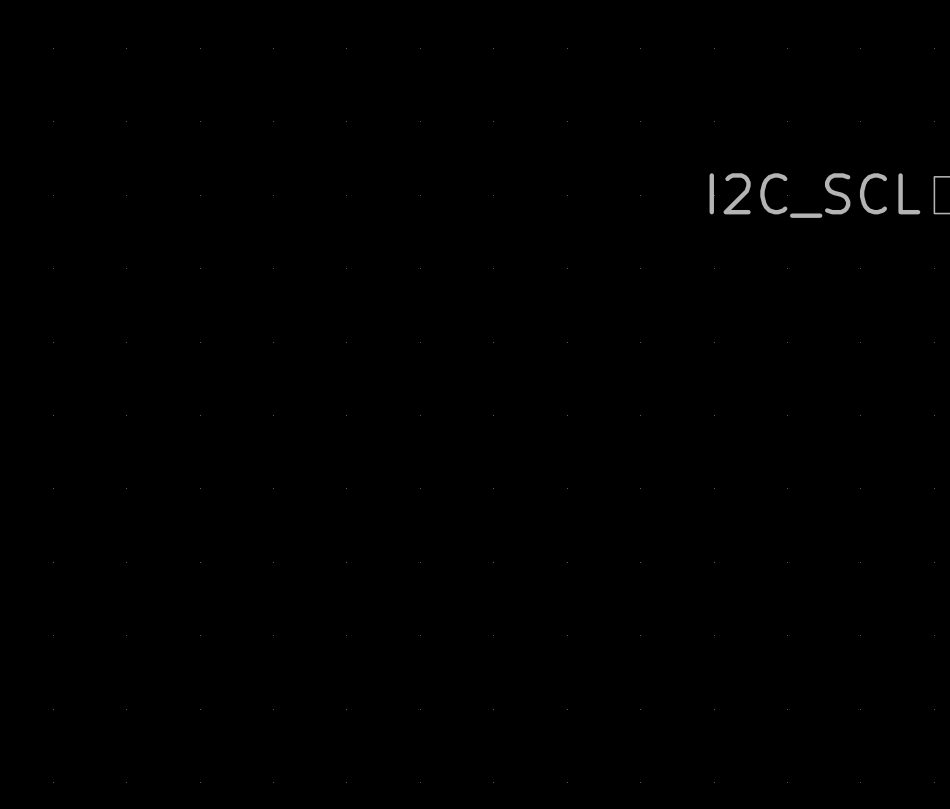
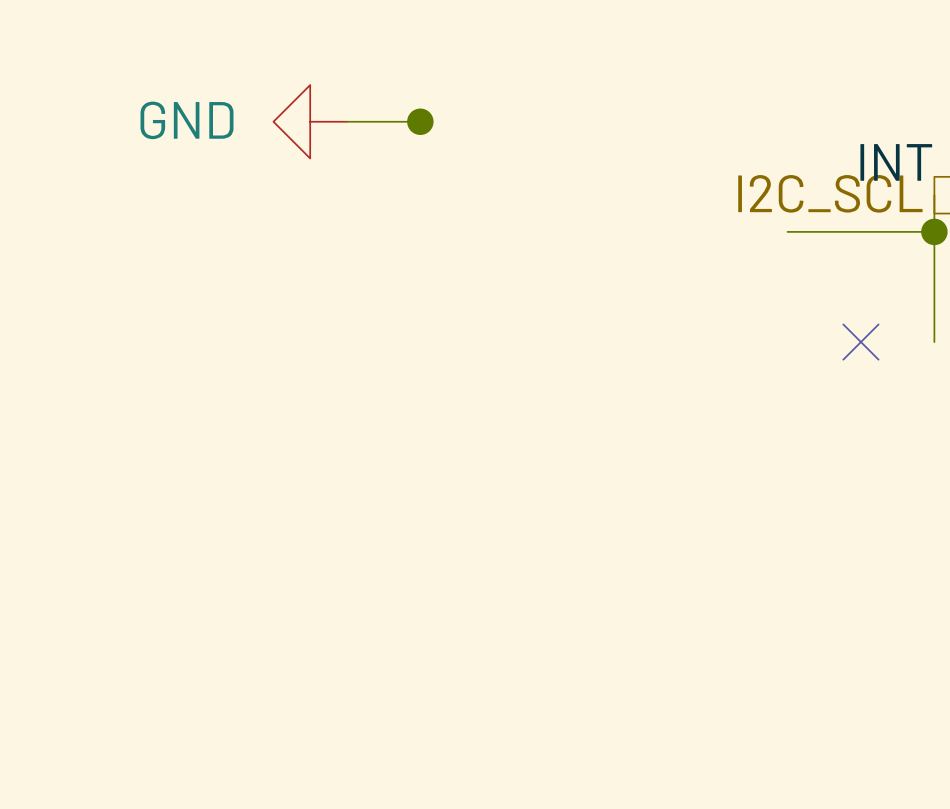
power symbol: none -> GND (310, 121)
wire: none -> (346, 121) (420, 121)
junction: none -> (420, 121)
label: none -> INT (896, 162)
wire: none -> (934, 195) (934, 342)
wire: none -> (787, 231) (934, 231)
junction: none -> (934, 231)
no-connect mark: none -> (860, 342)

